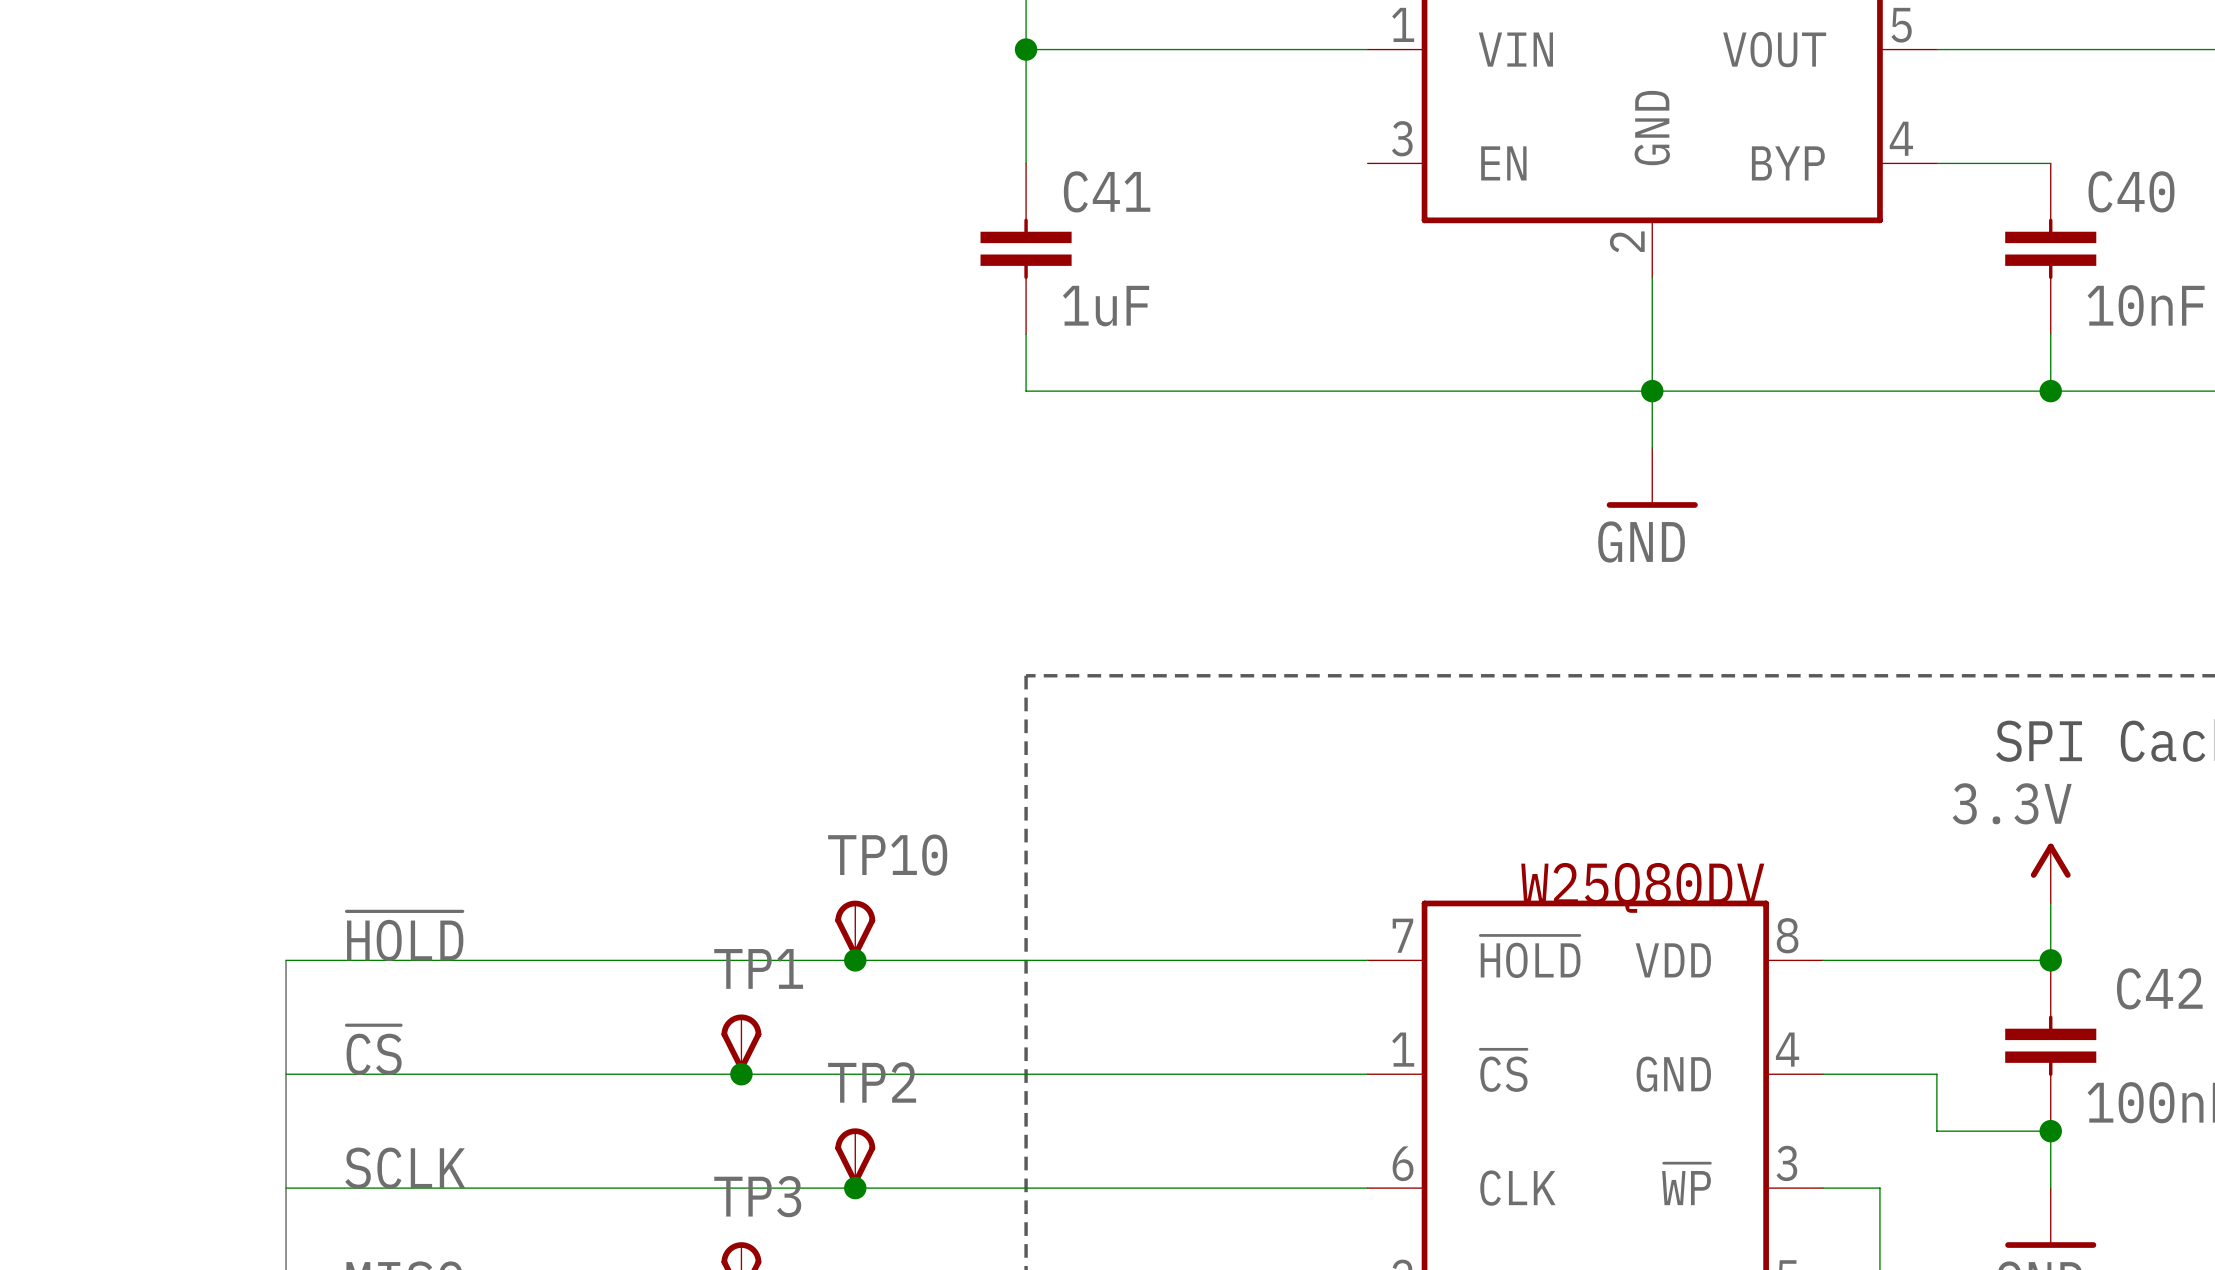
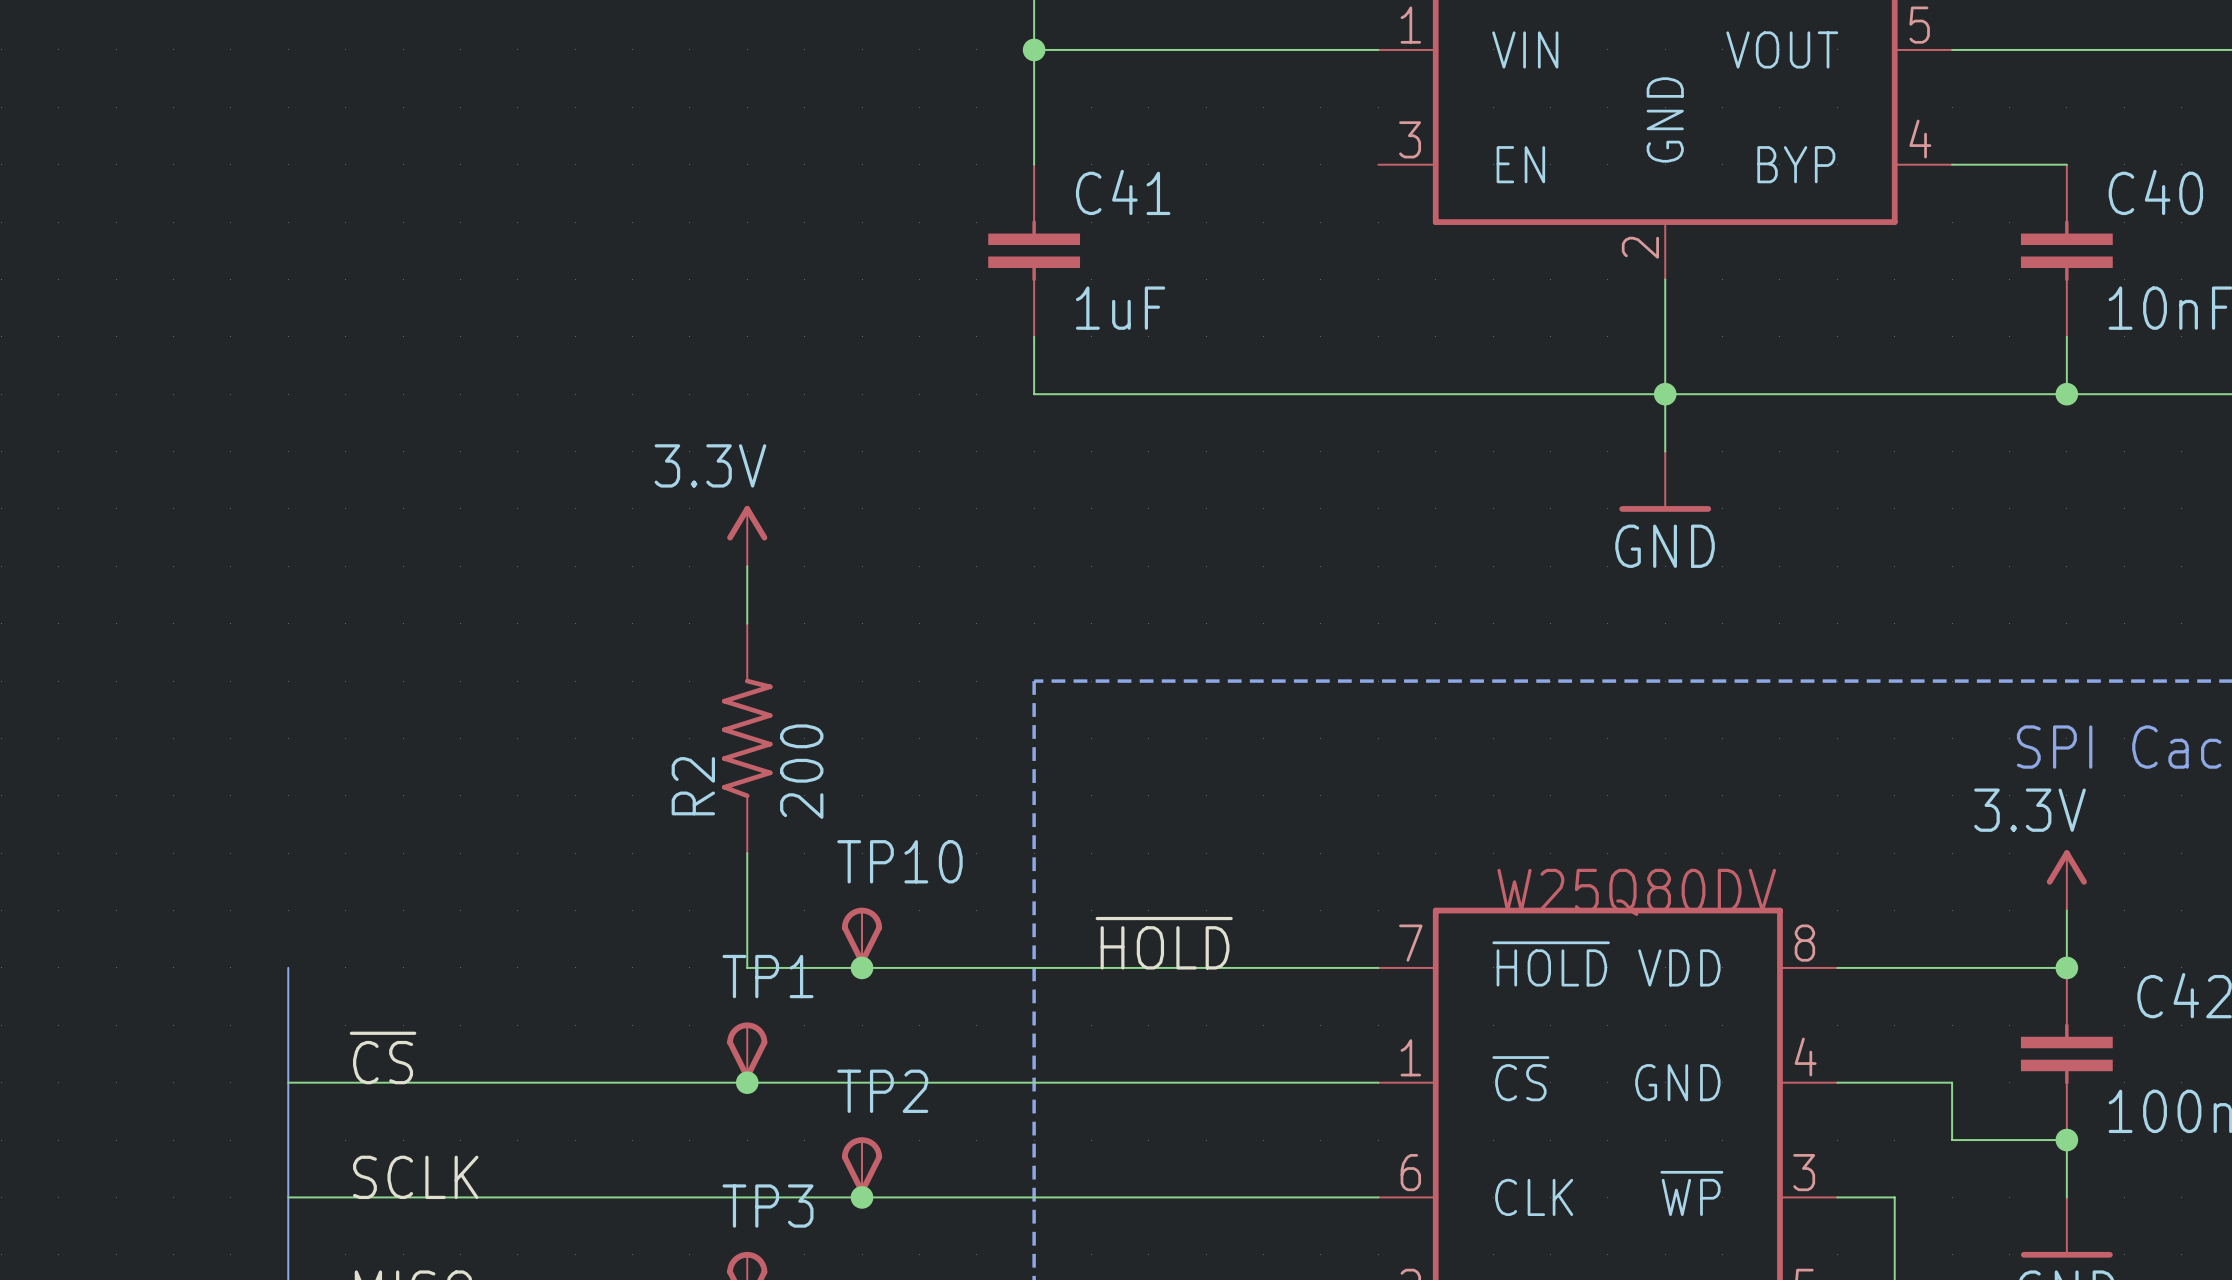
power symbol: none -> 3.3V (747, 536)
wire: none -> (747, 566) (747, 623)
R2: none -> 200 (747, 738)
label: ~{HOLD} (404, 936) -> none
label: none -> ~{HOLD} (1164, 943)
wire: (286, 960) (741, 960) -> (747, 853) (747, 967)

